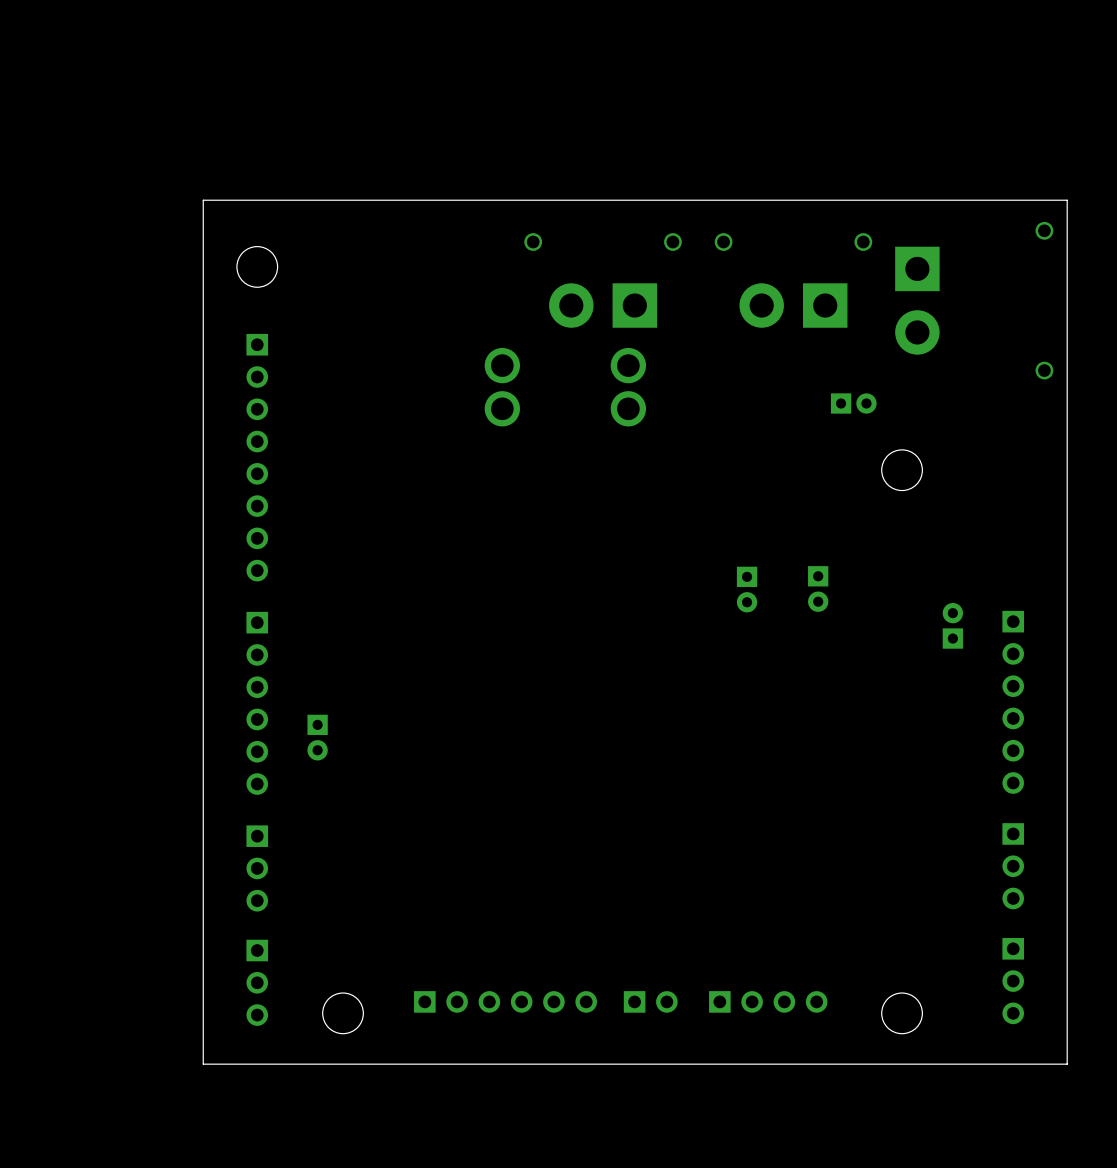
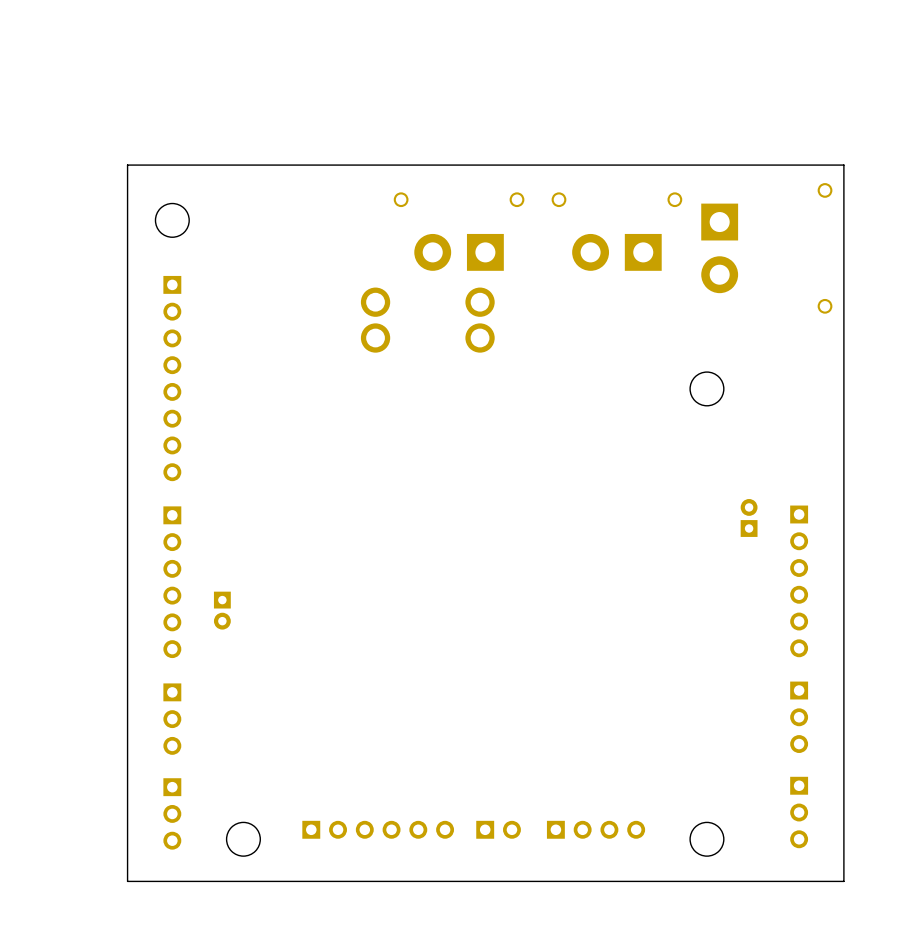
part: (853, 403) -> none
part: (818, 588) -> none
part: (747, 589) -> none

